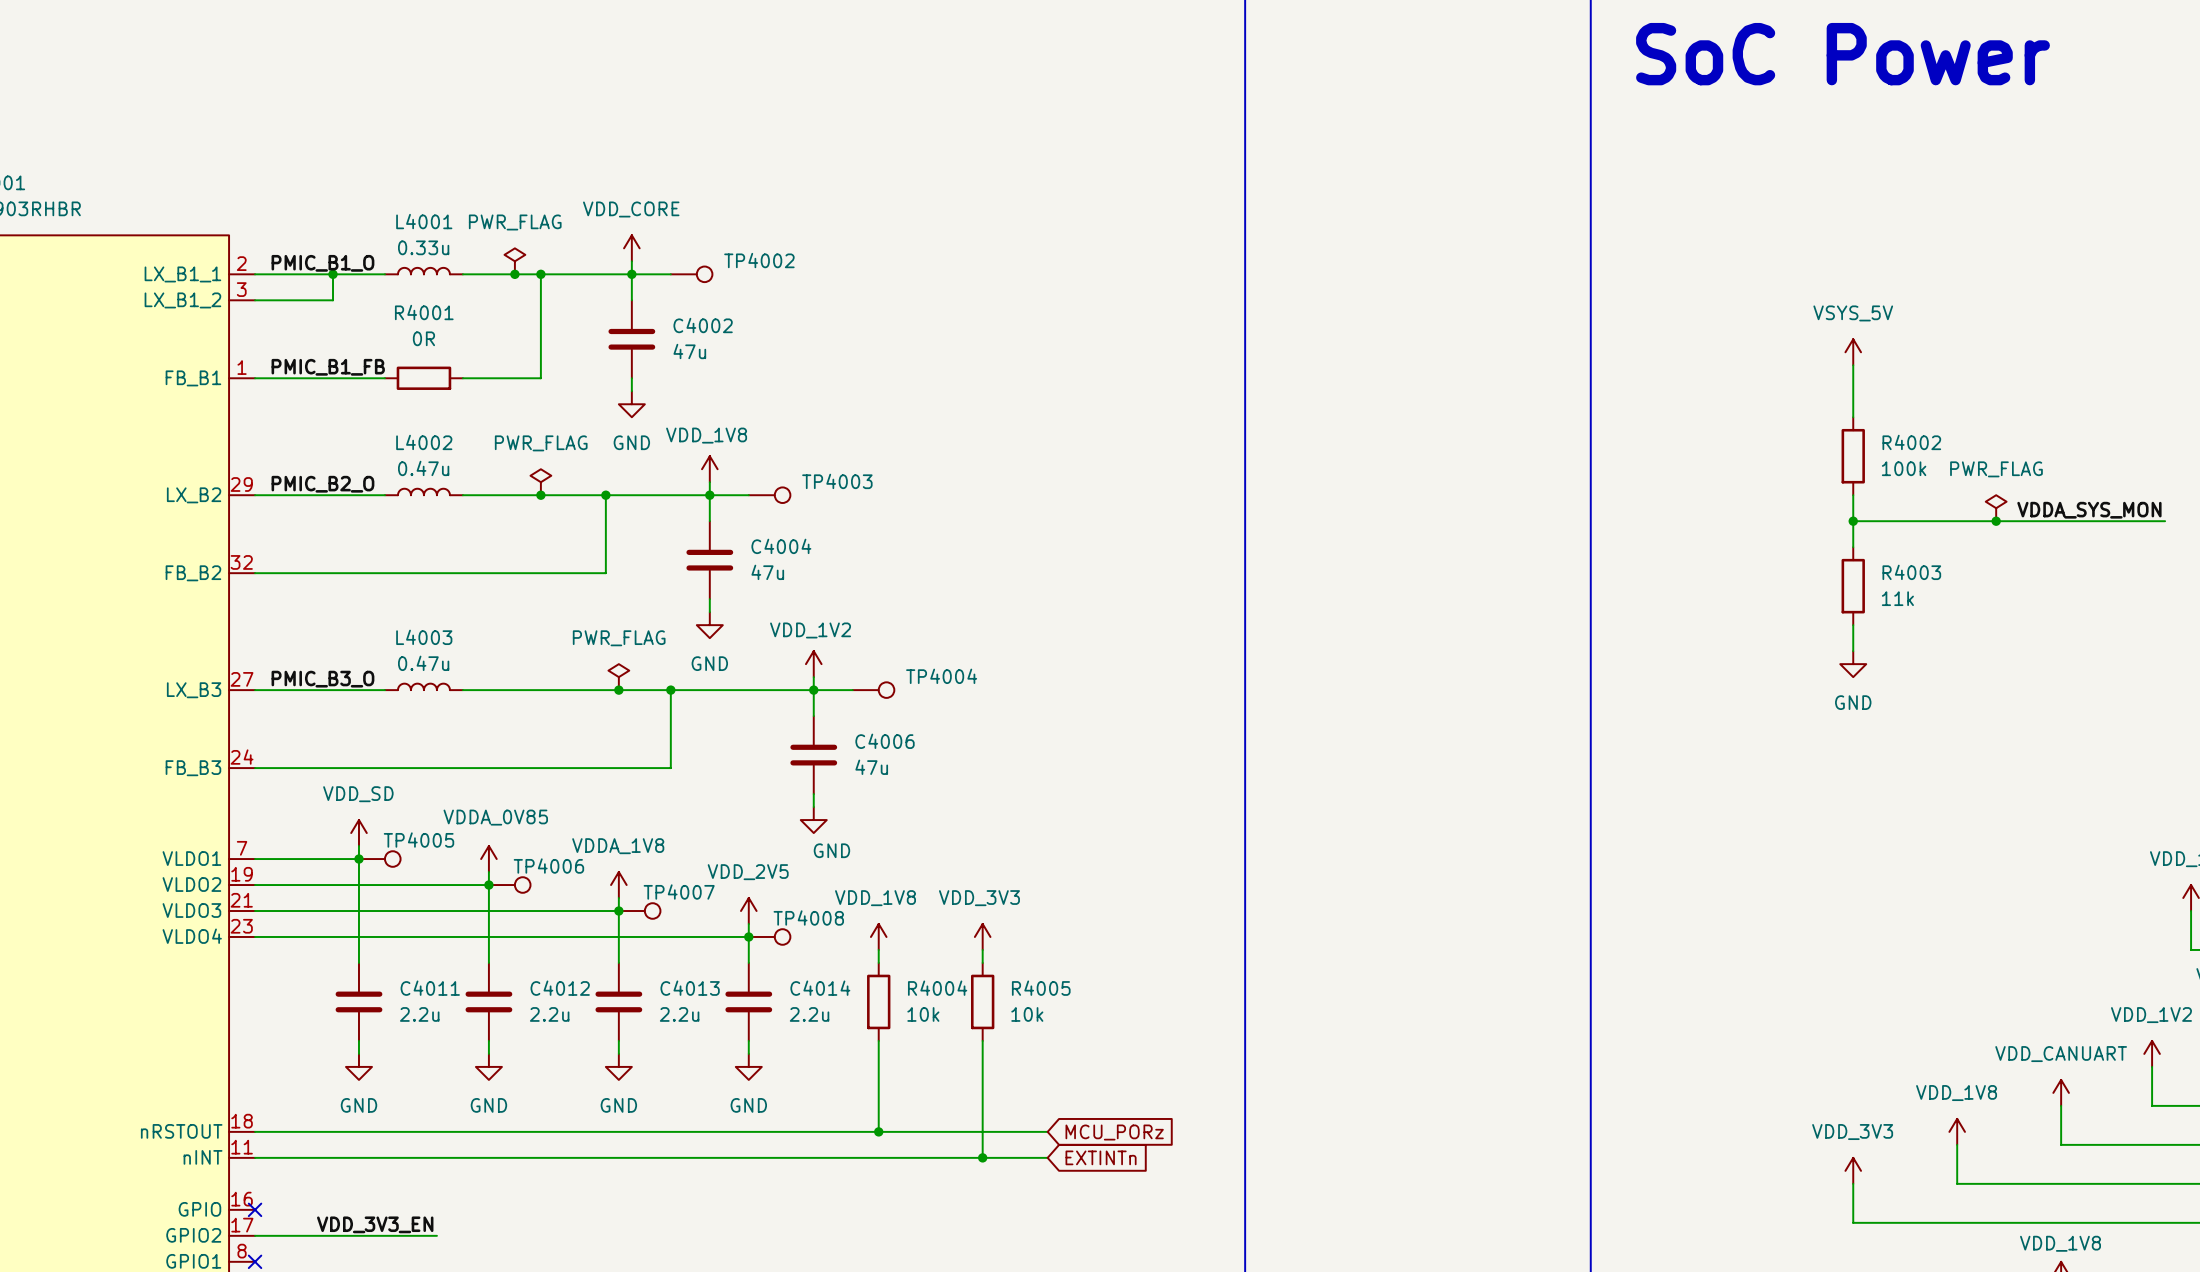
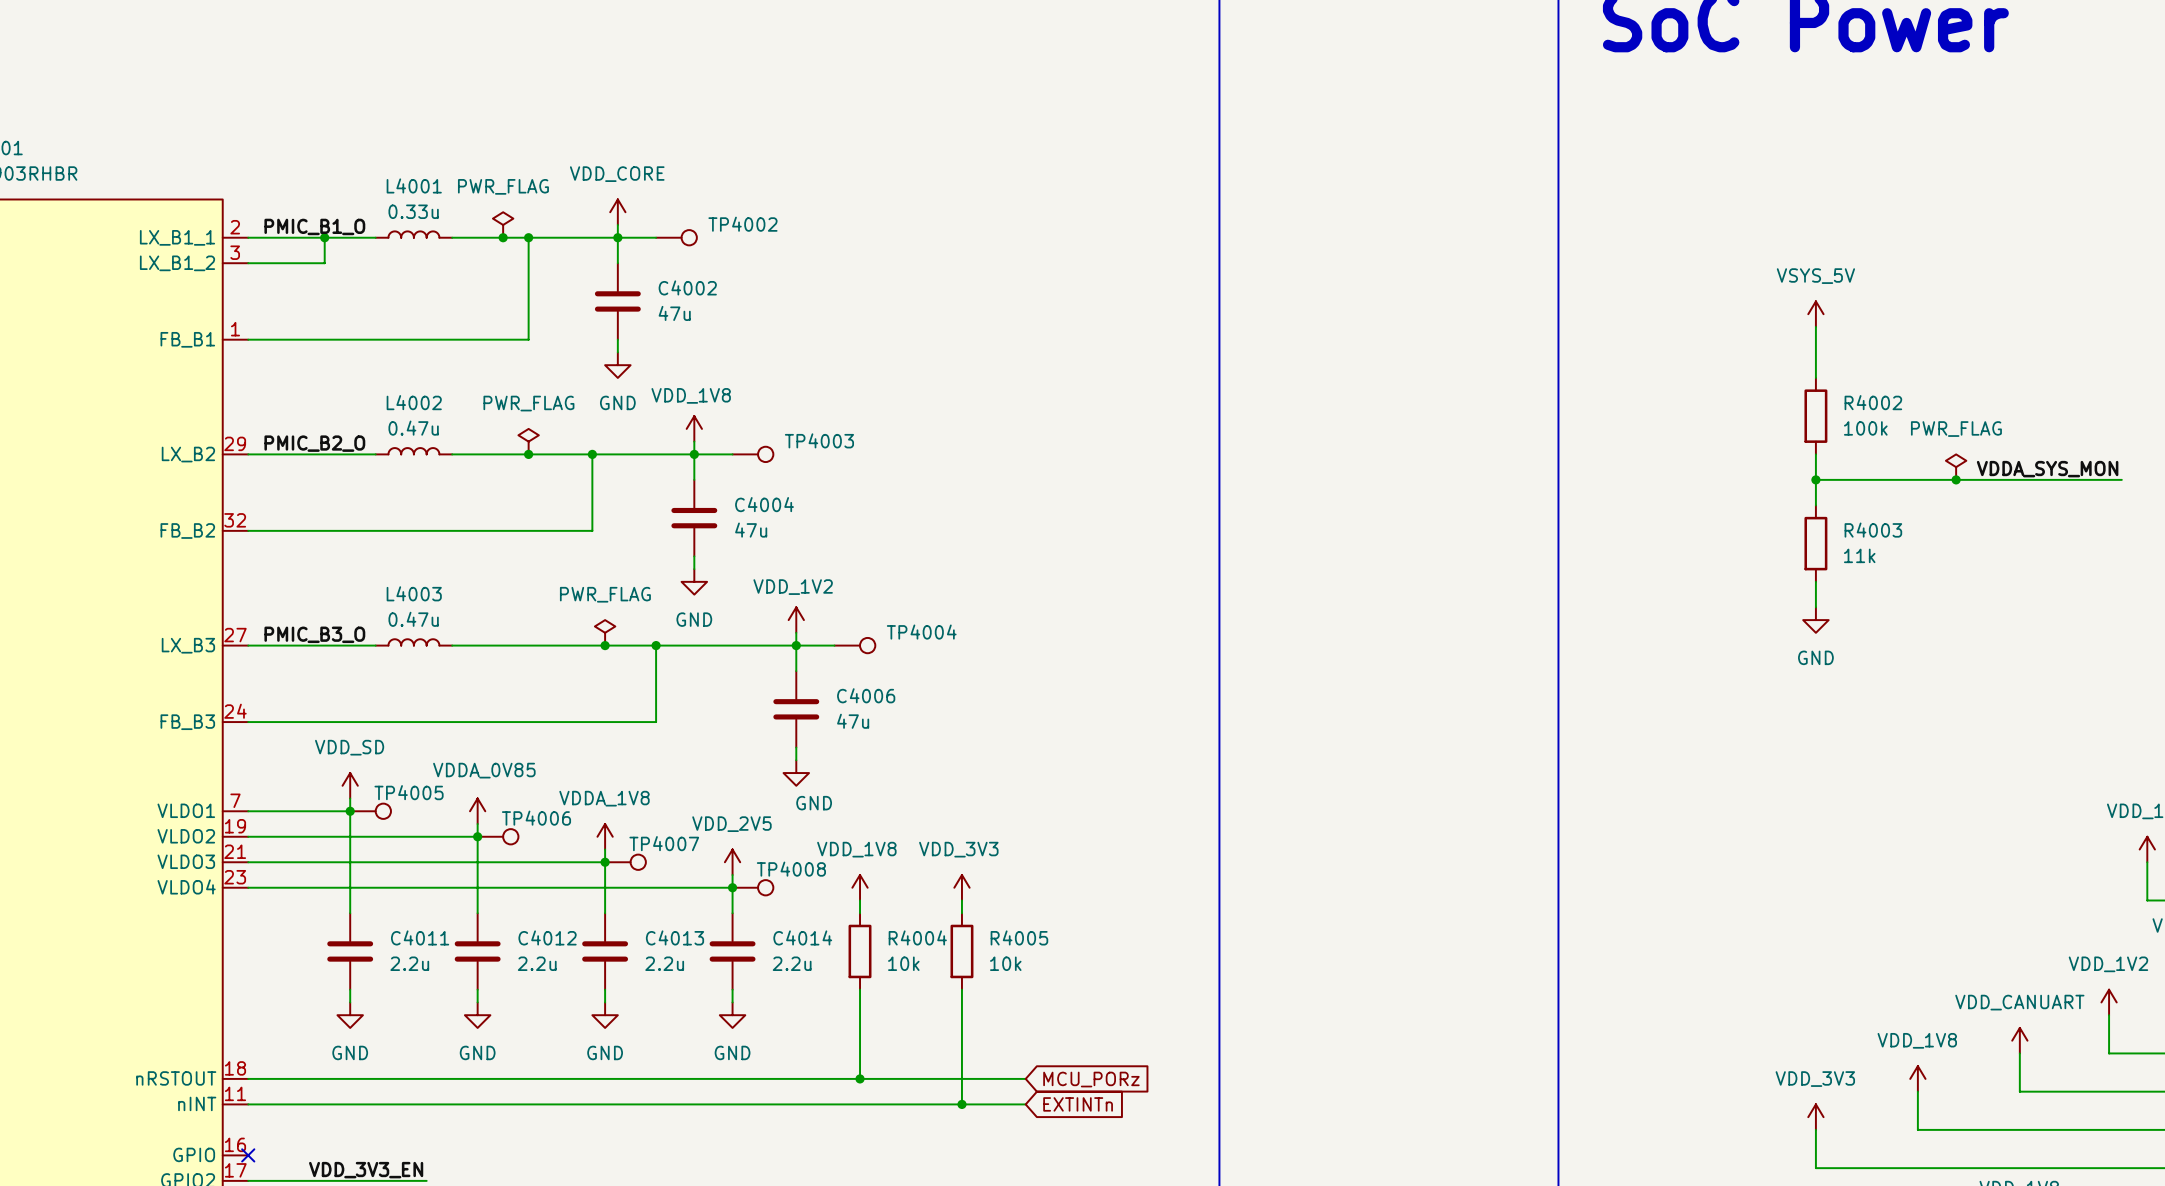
label: PMIC_B1_FB (328, 367) -> none
wire: none -> (375, 339) (452, 339)
R4001: 0R (423, 378) -> none

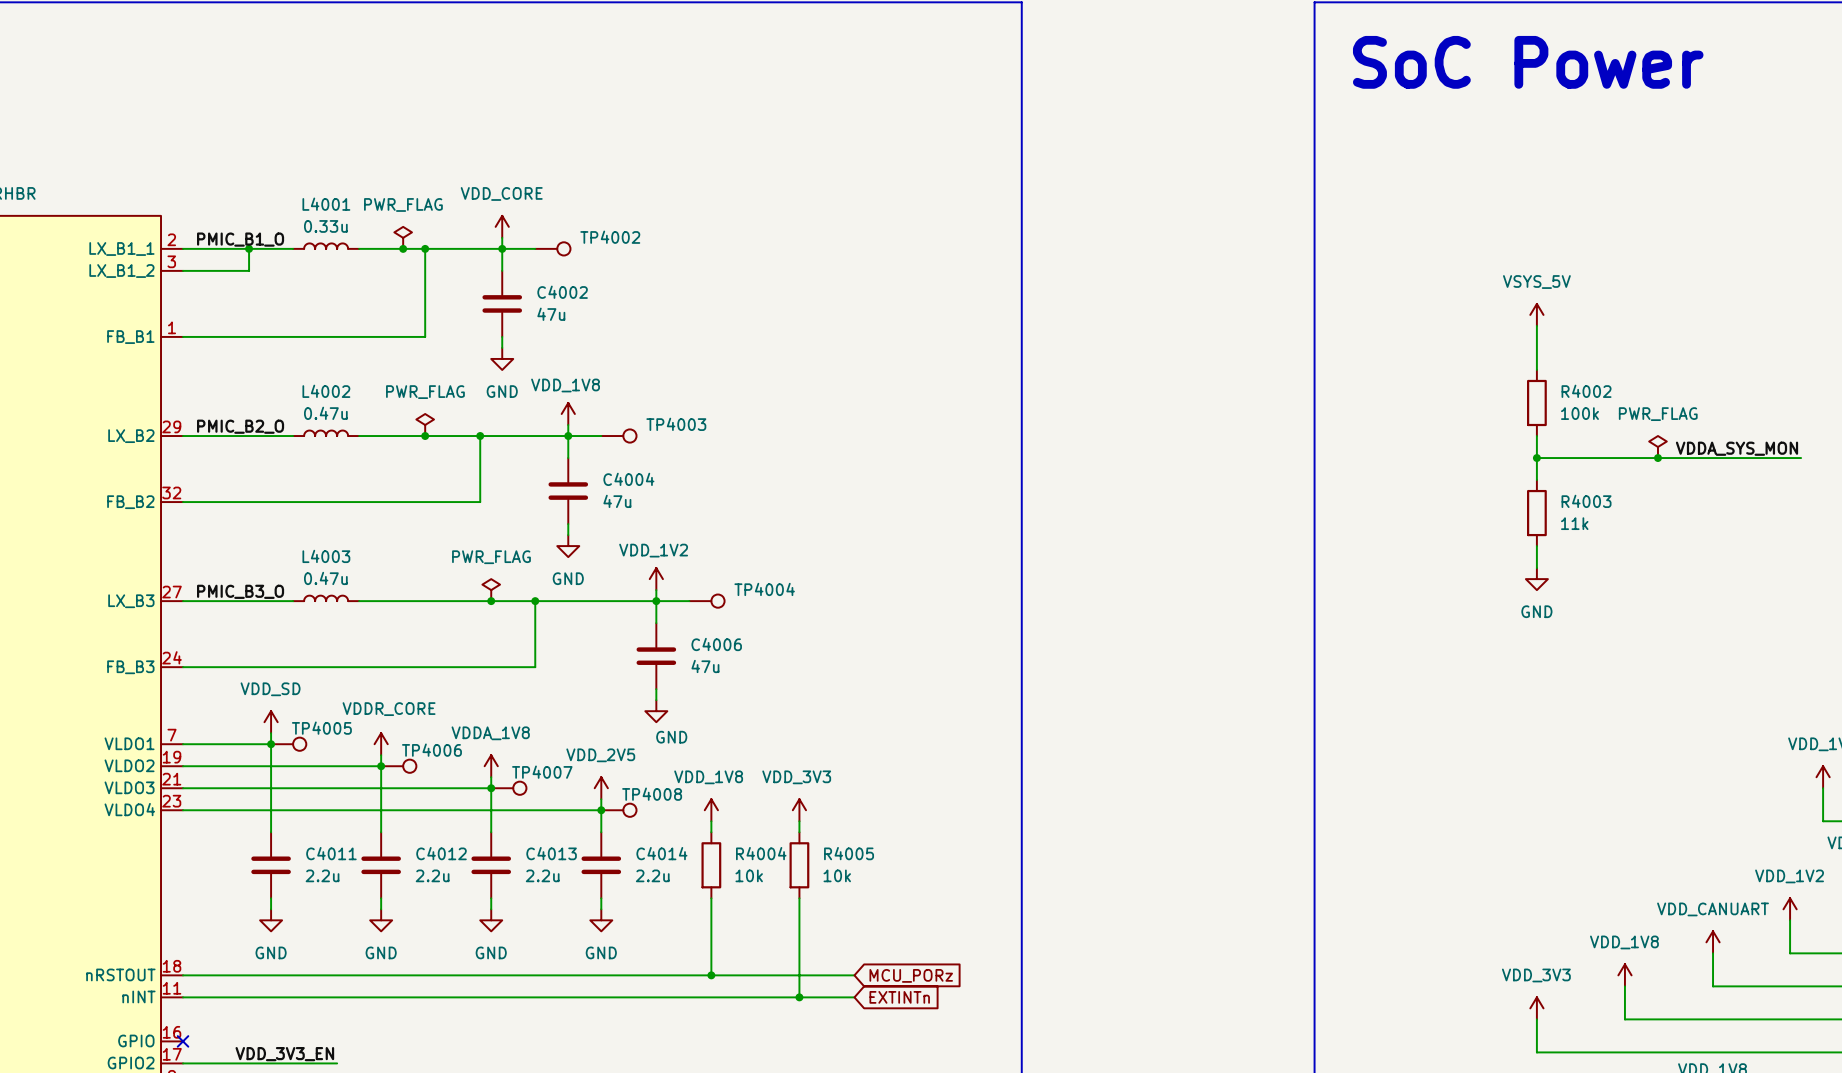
power symbol: VDDA_0V85 (477, 811) -> VDDR_CORE (381, 744)

